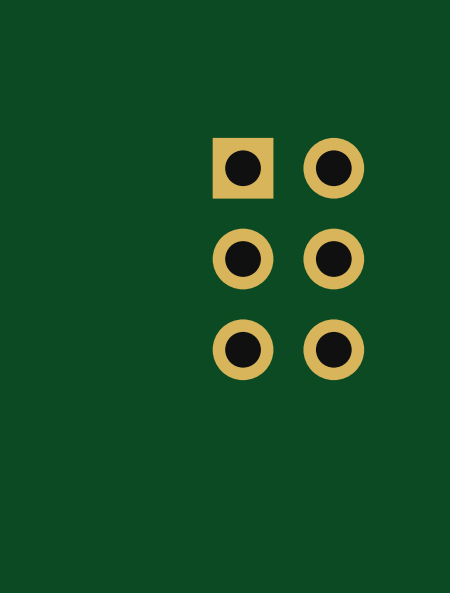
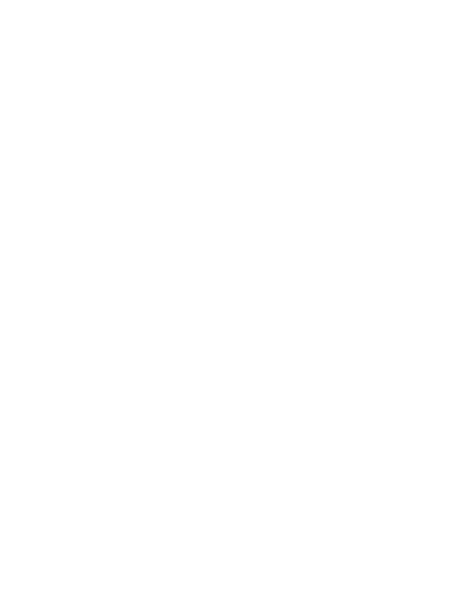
part: (288, 259) -> none

